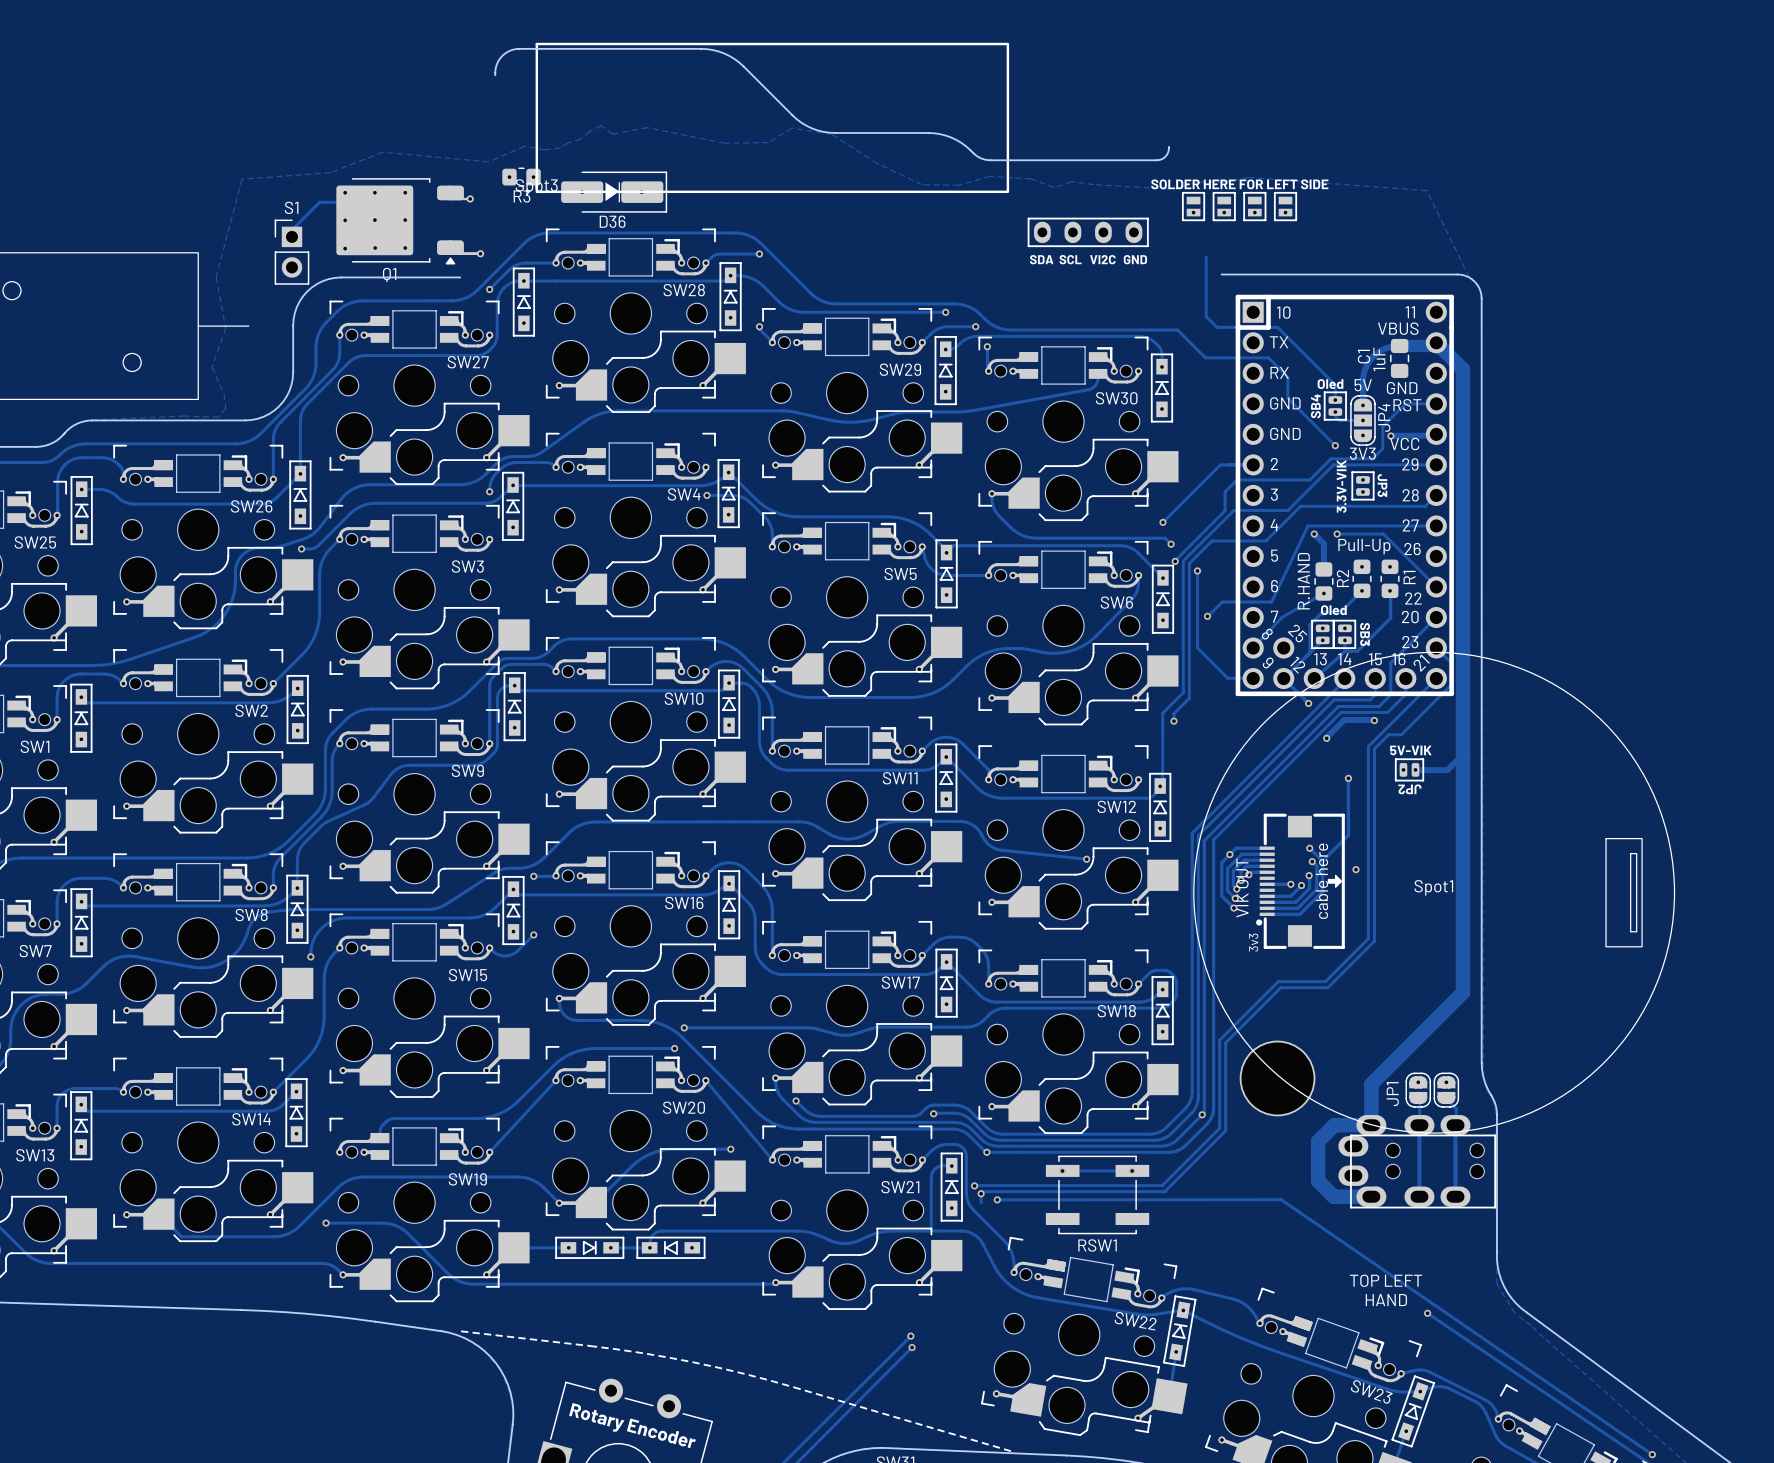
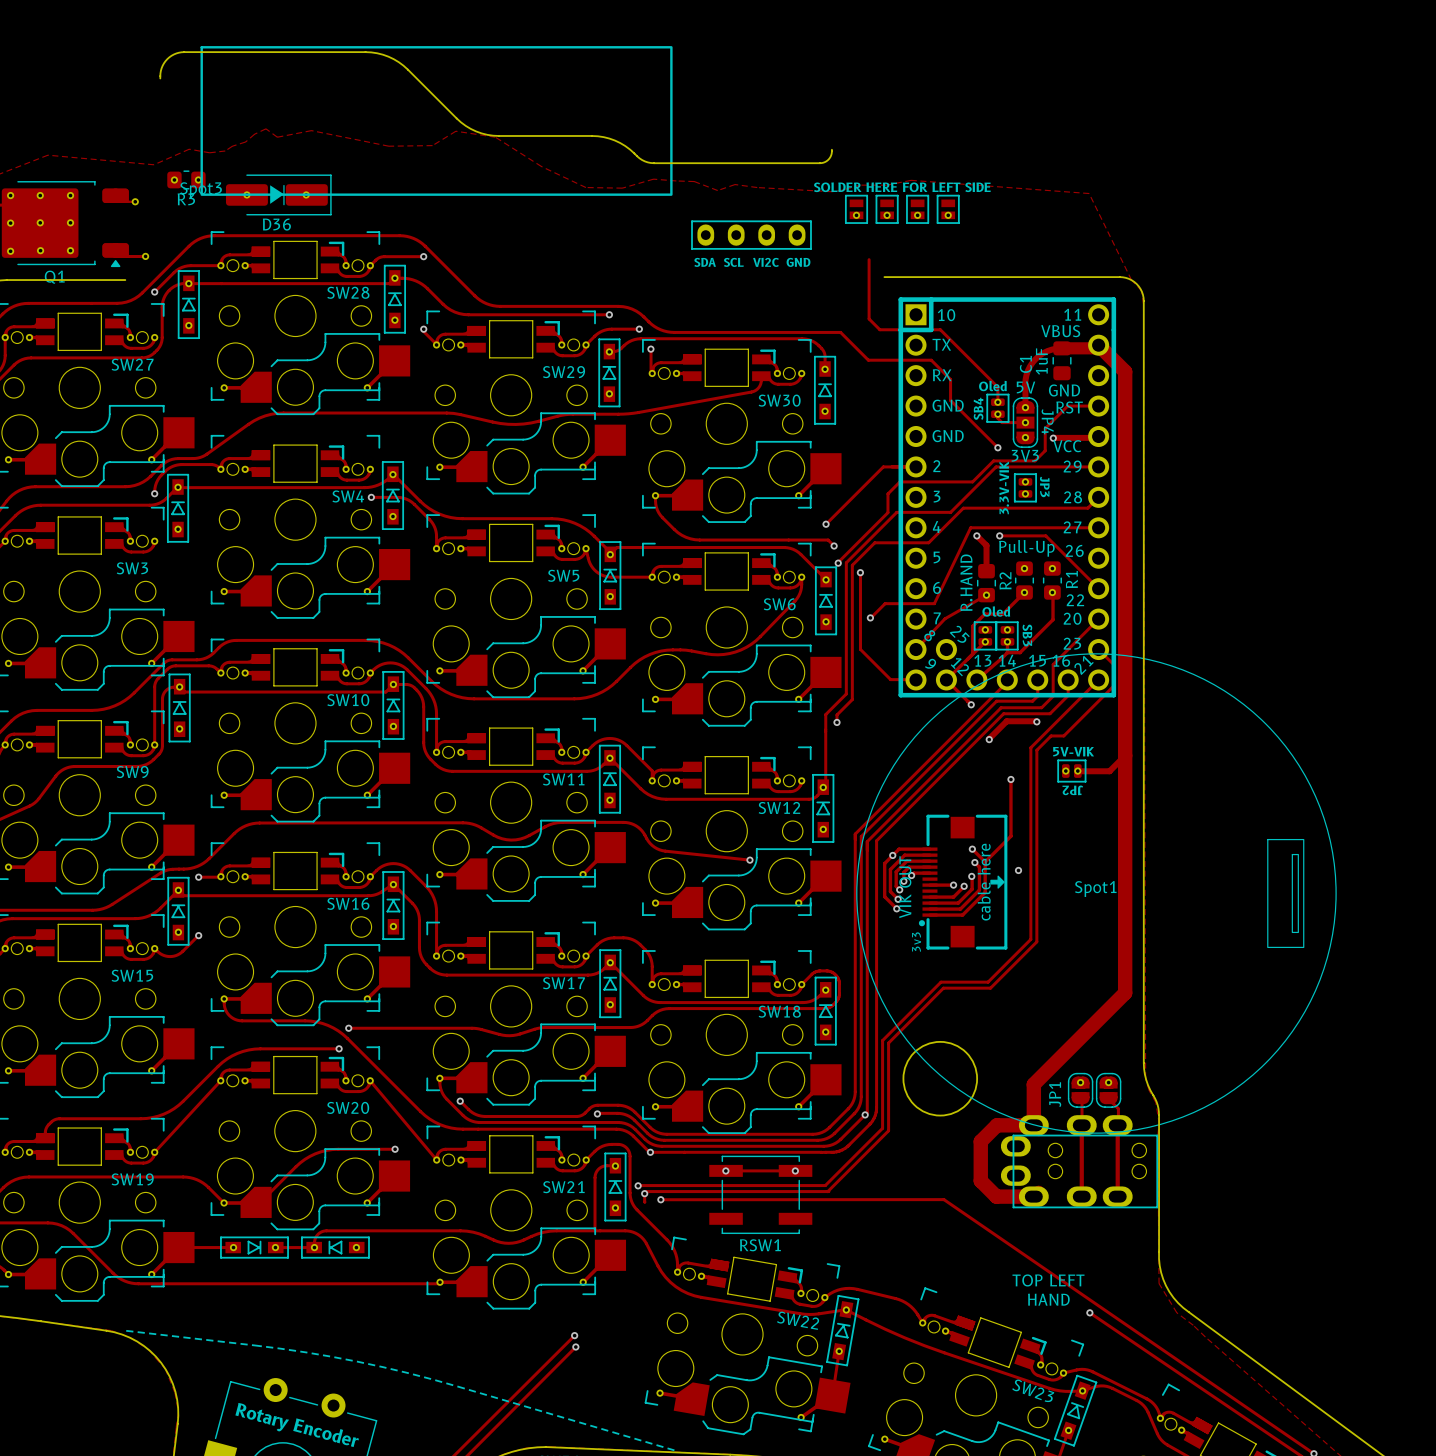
text: C1 (1363, 356) -> none
C1 name: none -> C1 (1025, 364)
part text rotation: 0° (1384, 417) -> 180° (1047, 421)

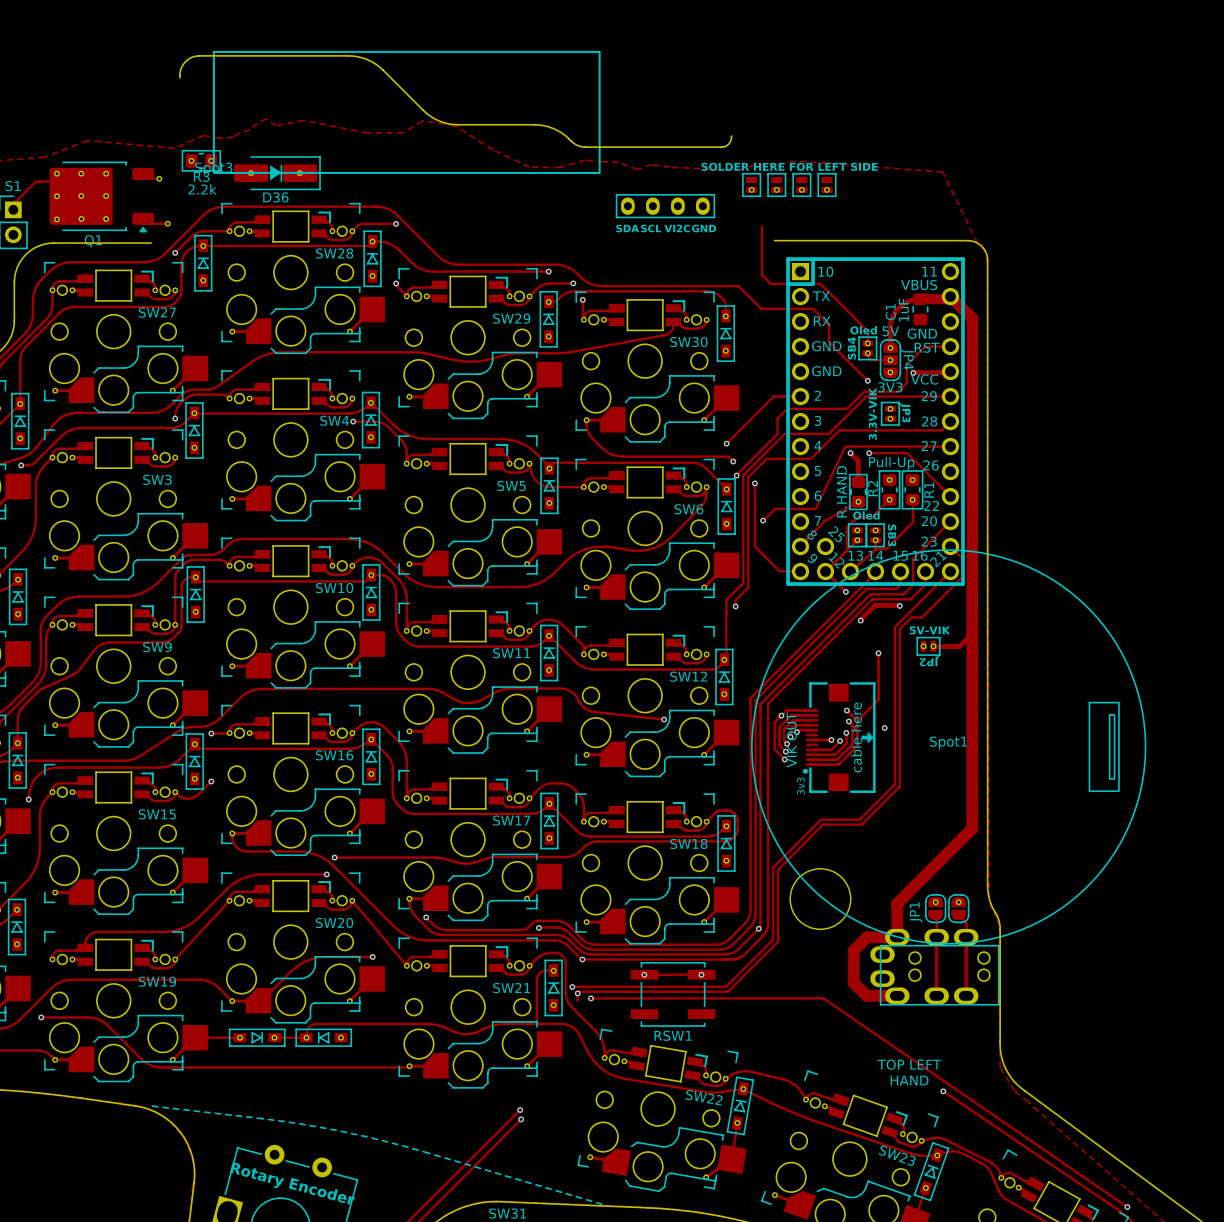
R3 footprint: [167, 170, 206, 190] -> [181, 150, 221, 172]
R3 text: none -> 2.2k (202, 189)
R2 footprint: [1014, 561, 1035, 600] -> [879, 470, 901, 510]
R1 footprint: [1042, 561, 1062, 600] -> [901, 470, 924, 510]
part footprint: [976, 563, 997, 603] -> [849, 474, 868, 510]

